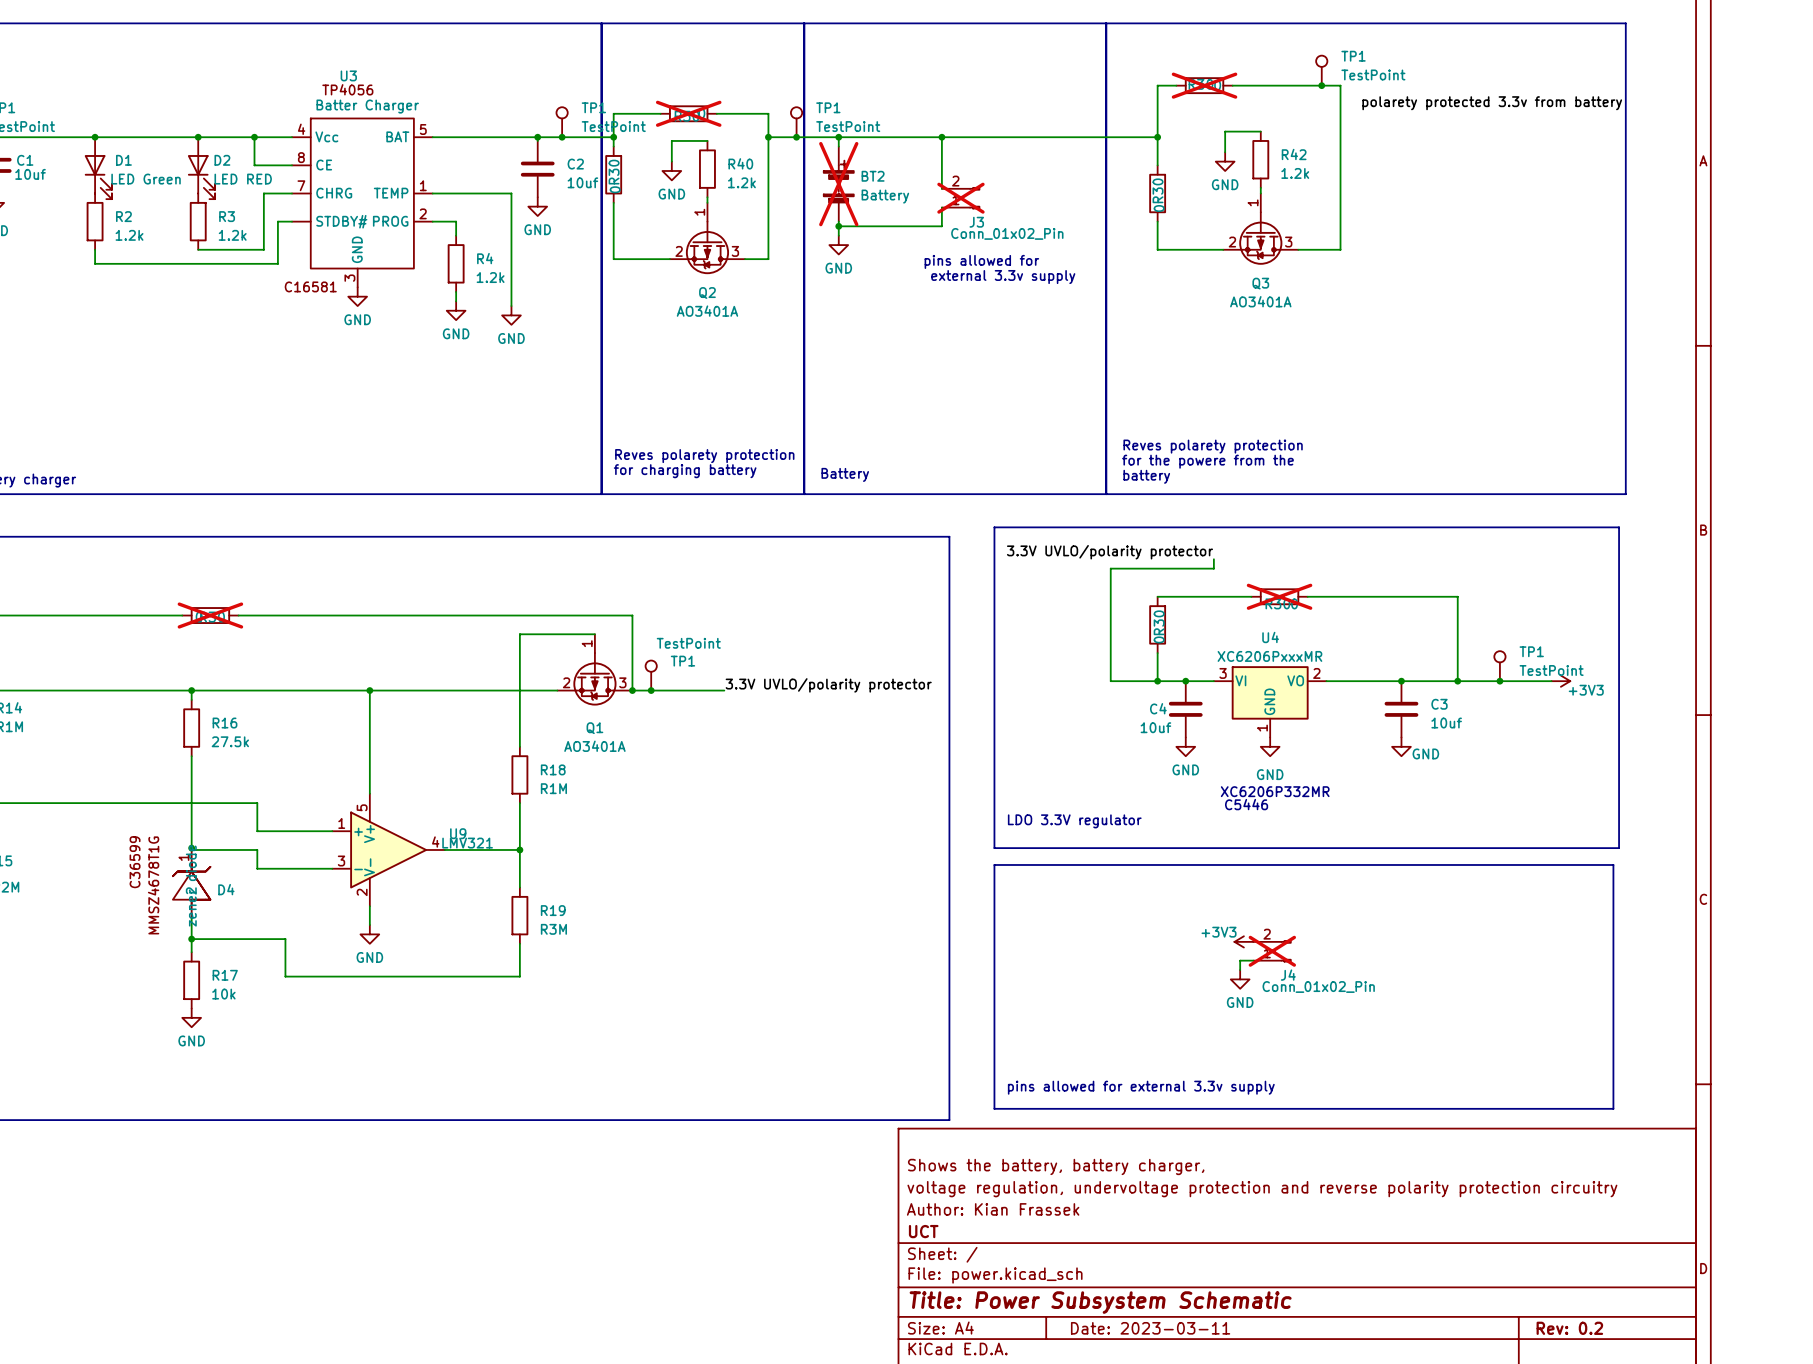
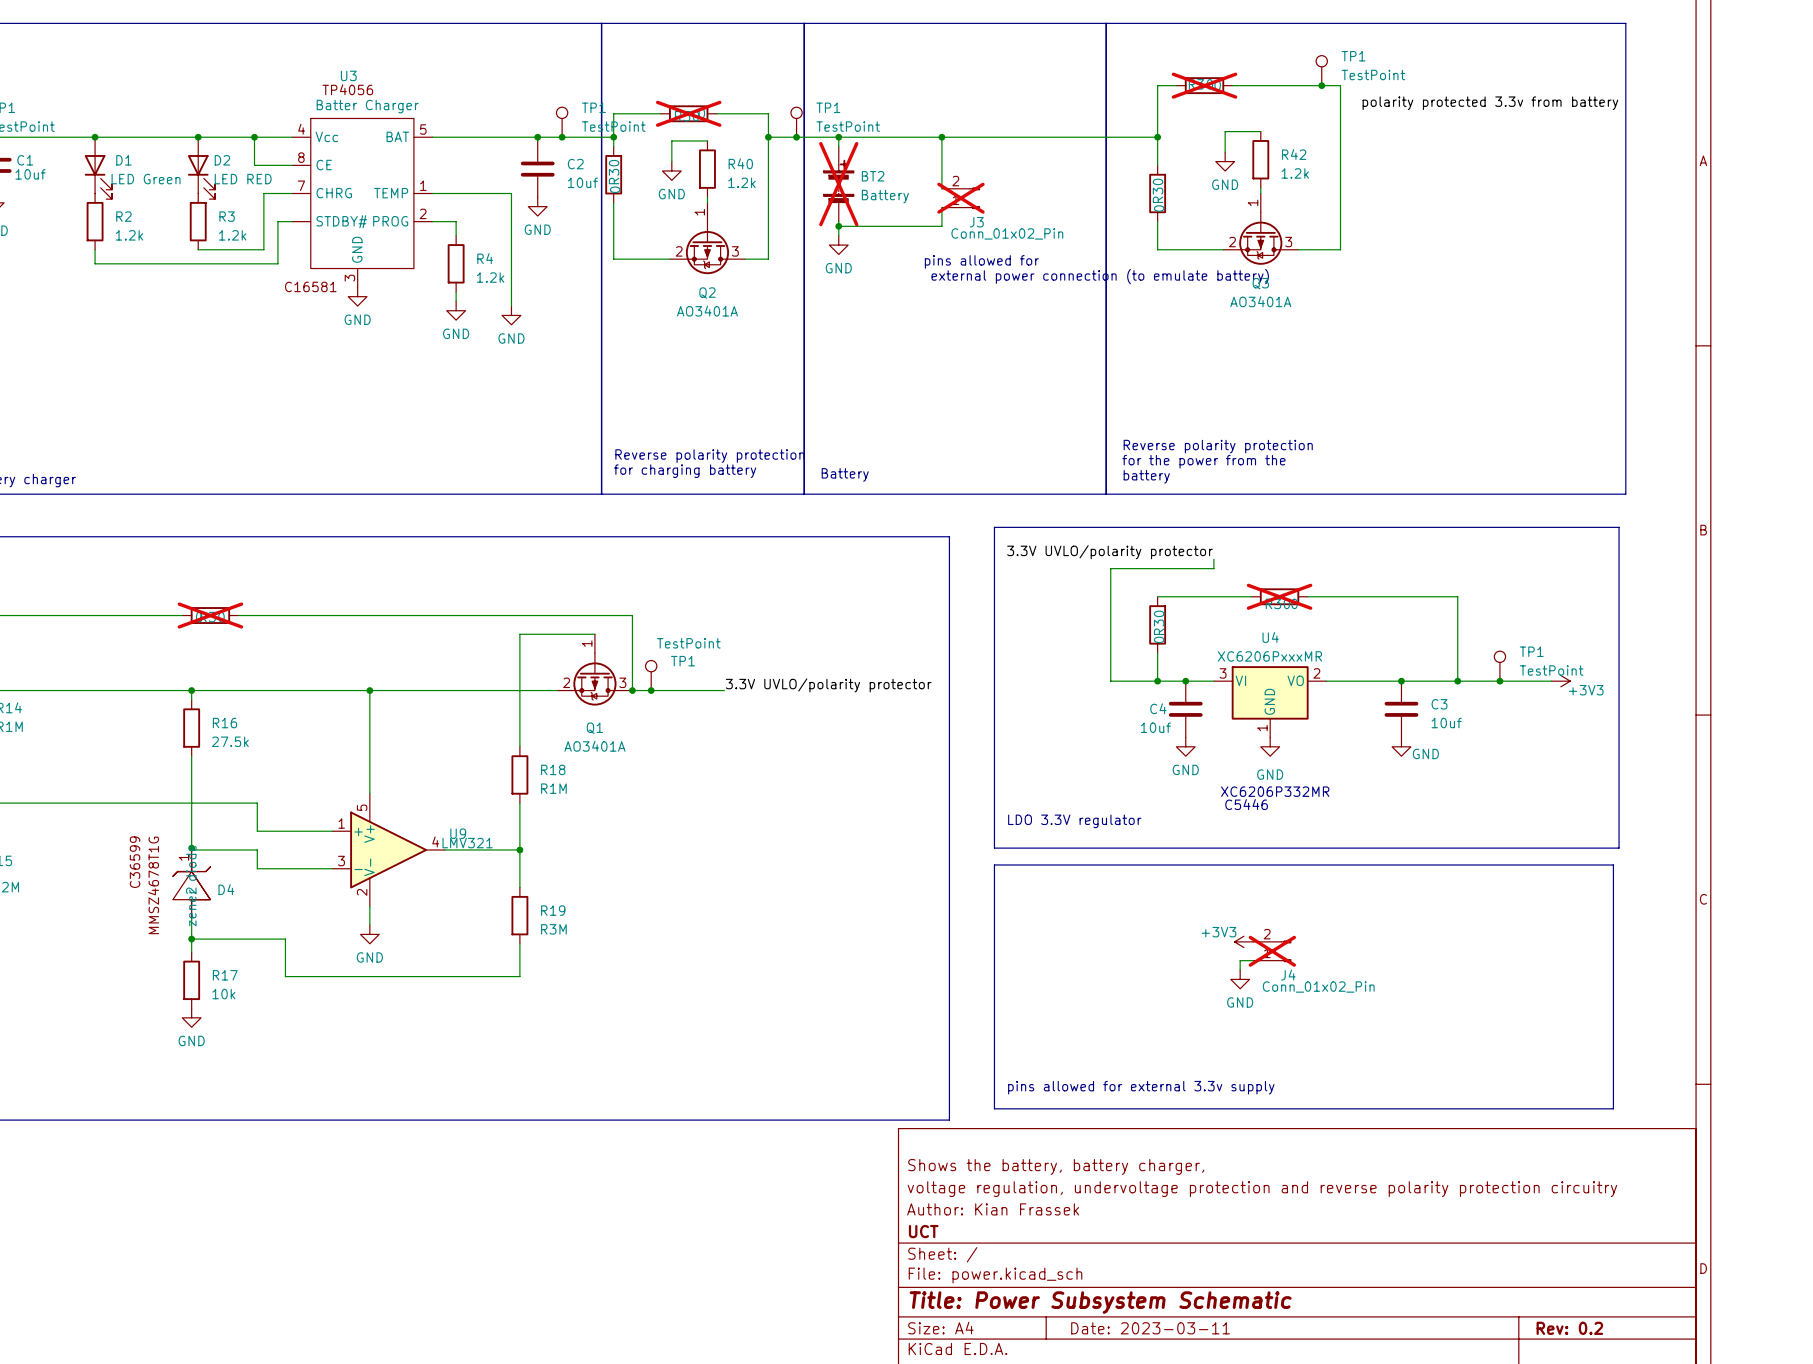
label: polarety protected 3.3v from battery (1492, 103) -> polarity protected 3.3v from battery (1490, 103)
text: external 3.3v supply (1003, 277) -> external power connection (to emulate battery) (1100, 276)
text: Reves polarety protection (1213, 446) -> Reverse polarity protection (1218, 446)
text: Reves polarety protection (704, 456) -> Reverse polarity protection (709, 456)
text: for the powere from the (1207, 461) -> for the power from the (1203, 461)

